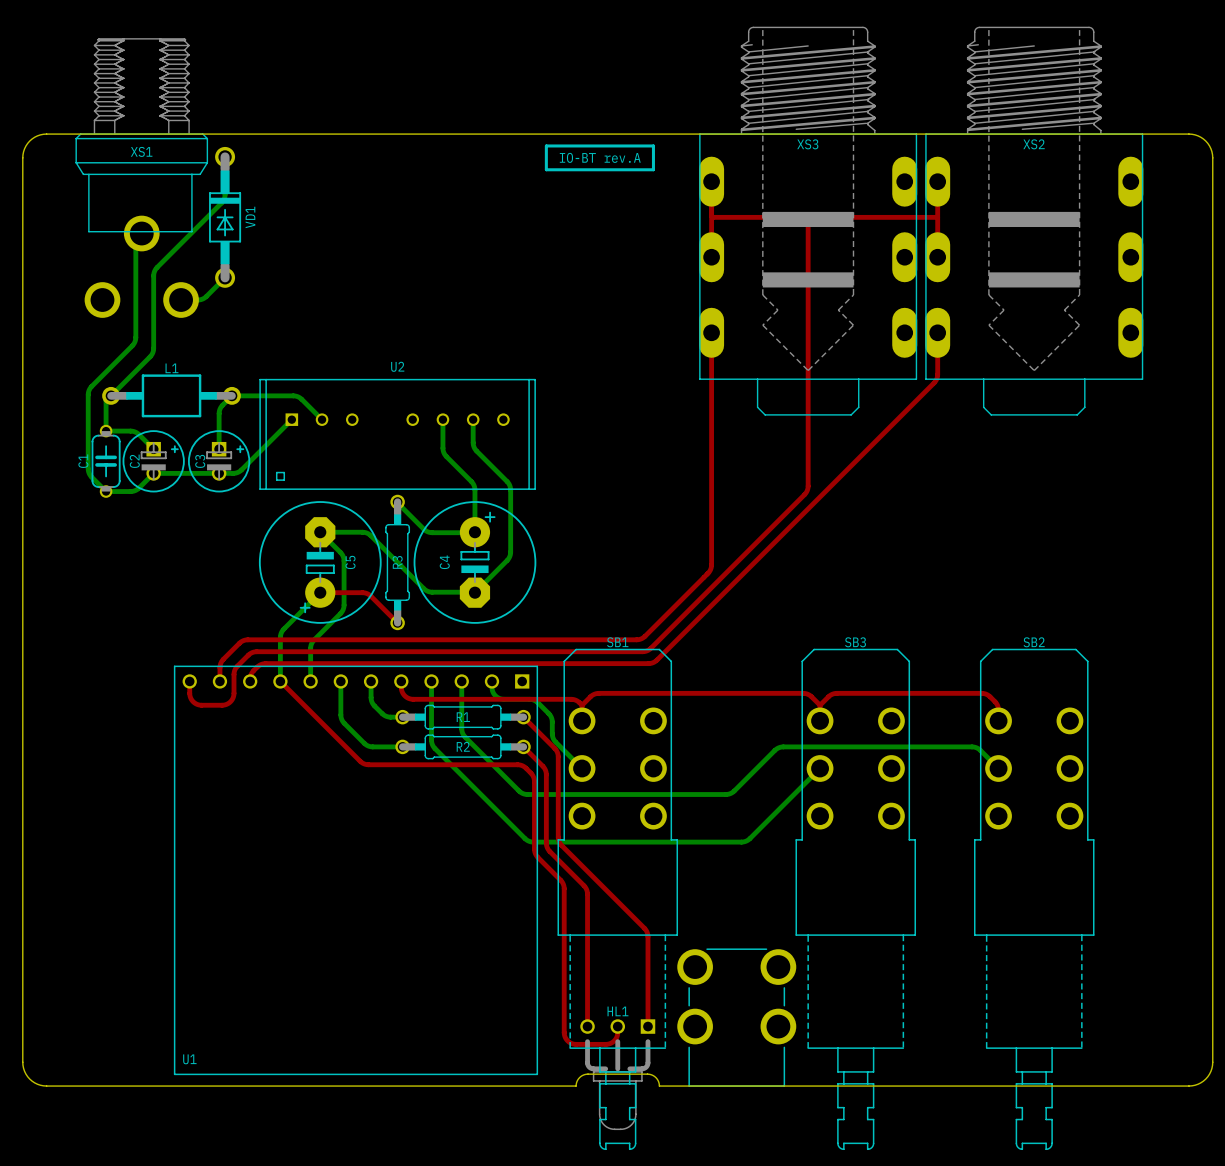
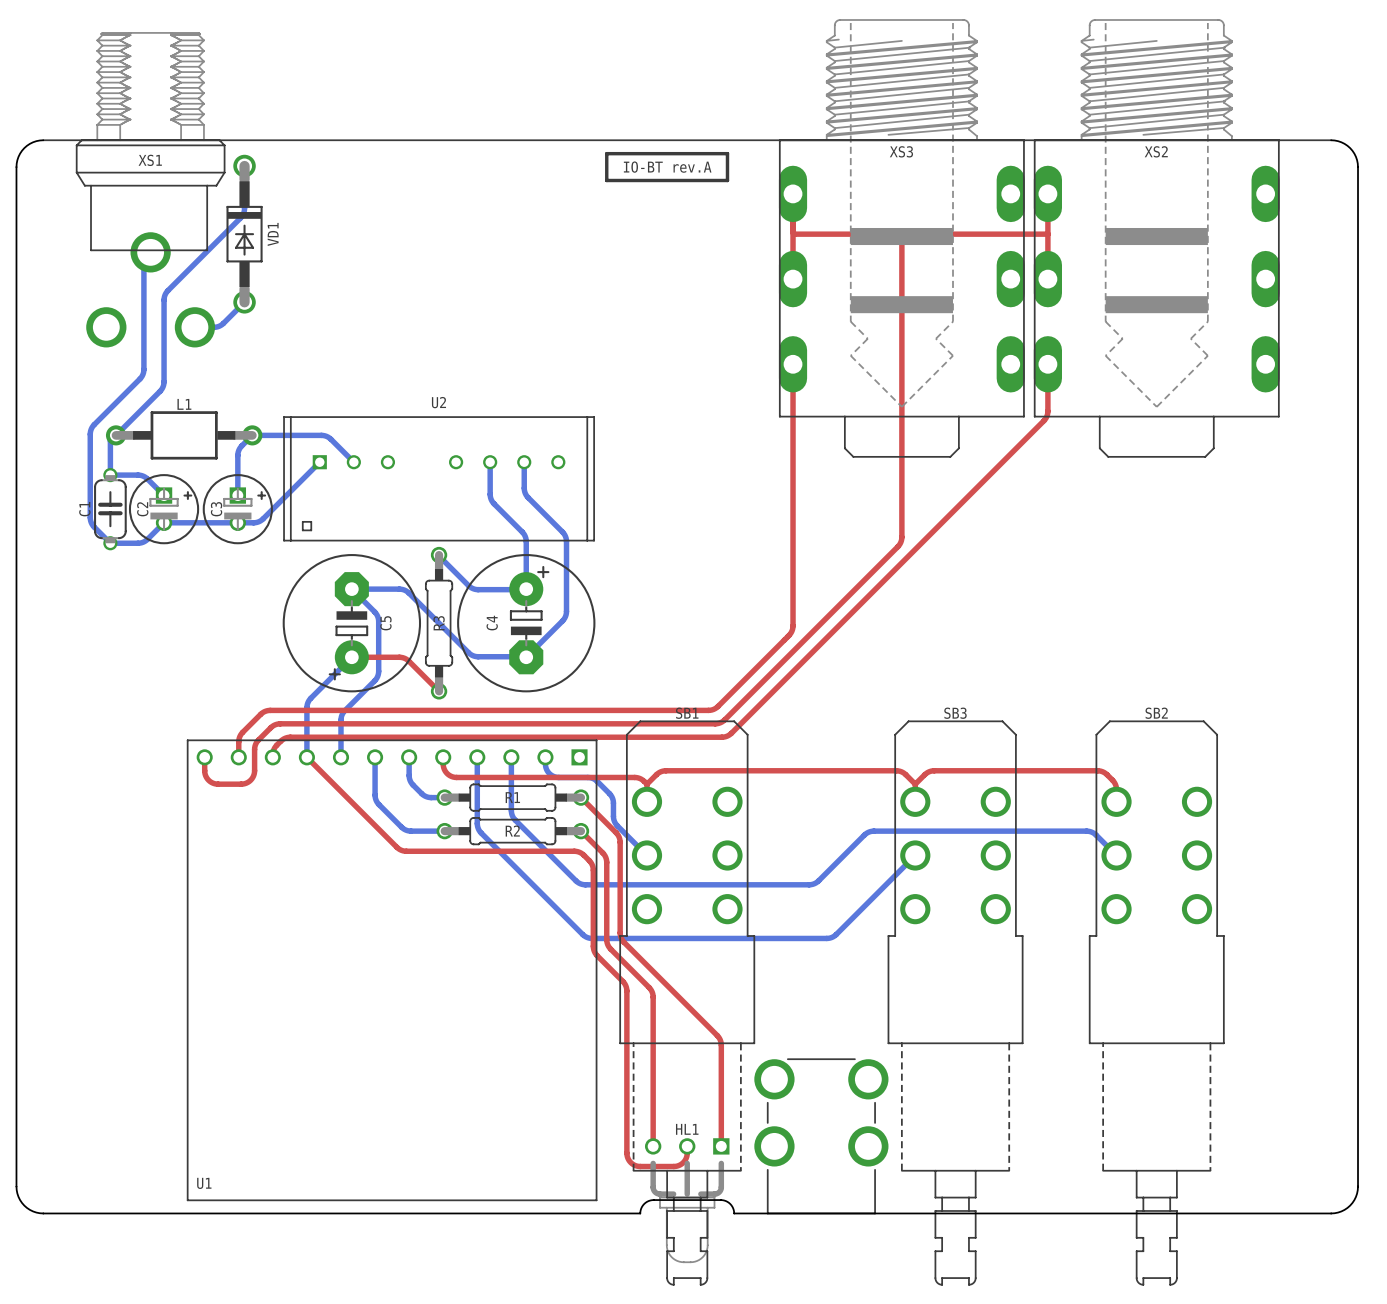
board edge: (46, 134) (1188, 134) -> none
line: none -> (43, 140) (1331, 140)

